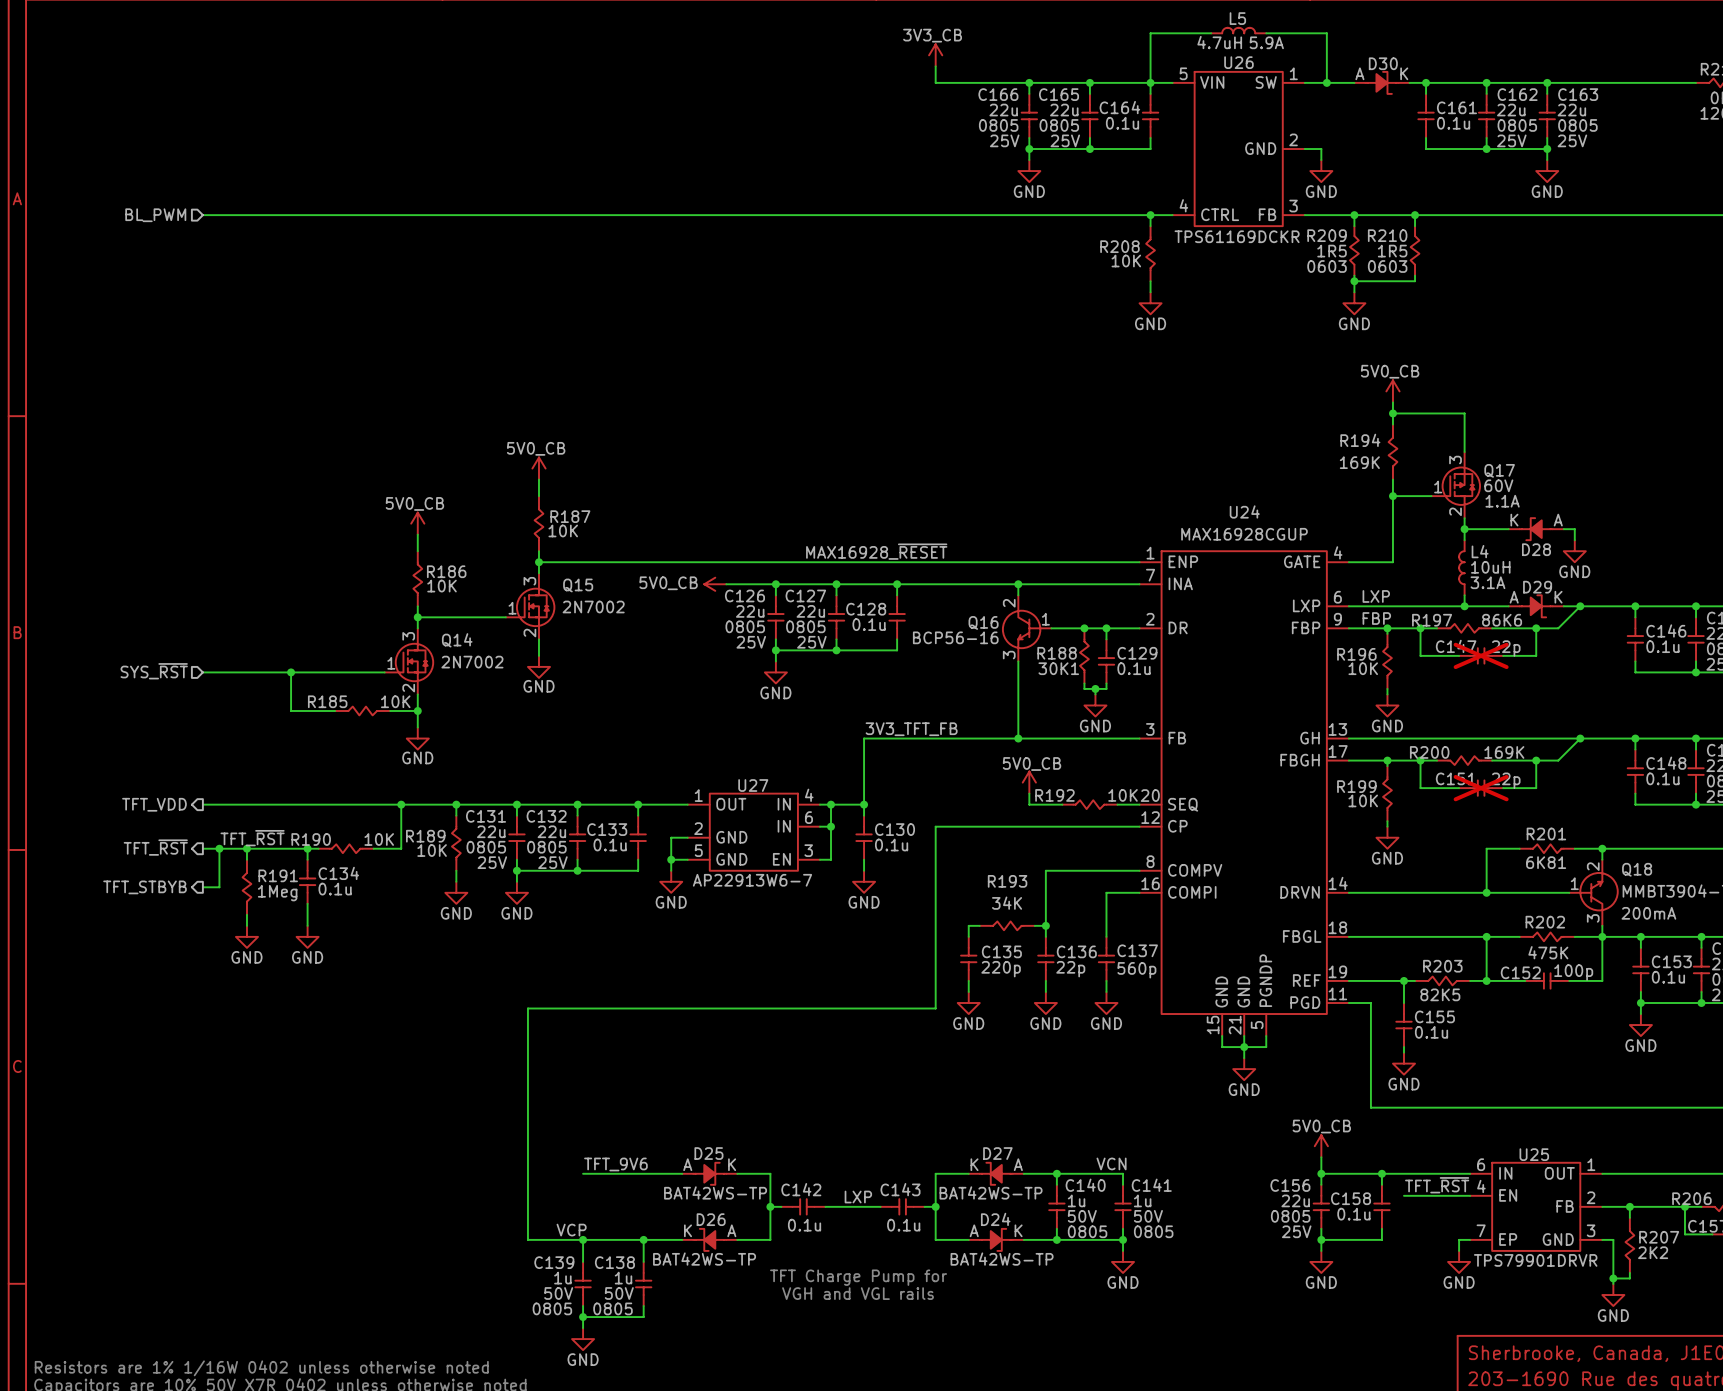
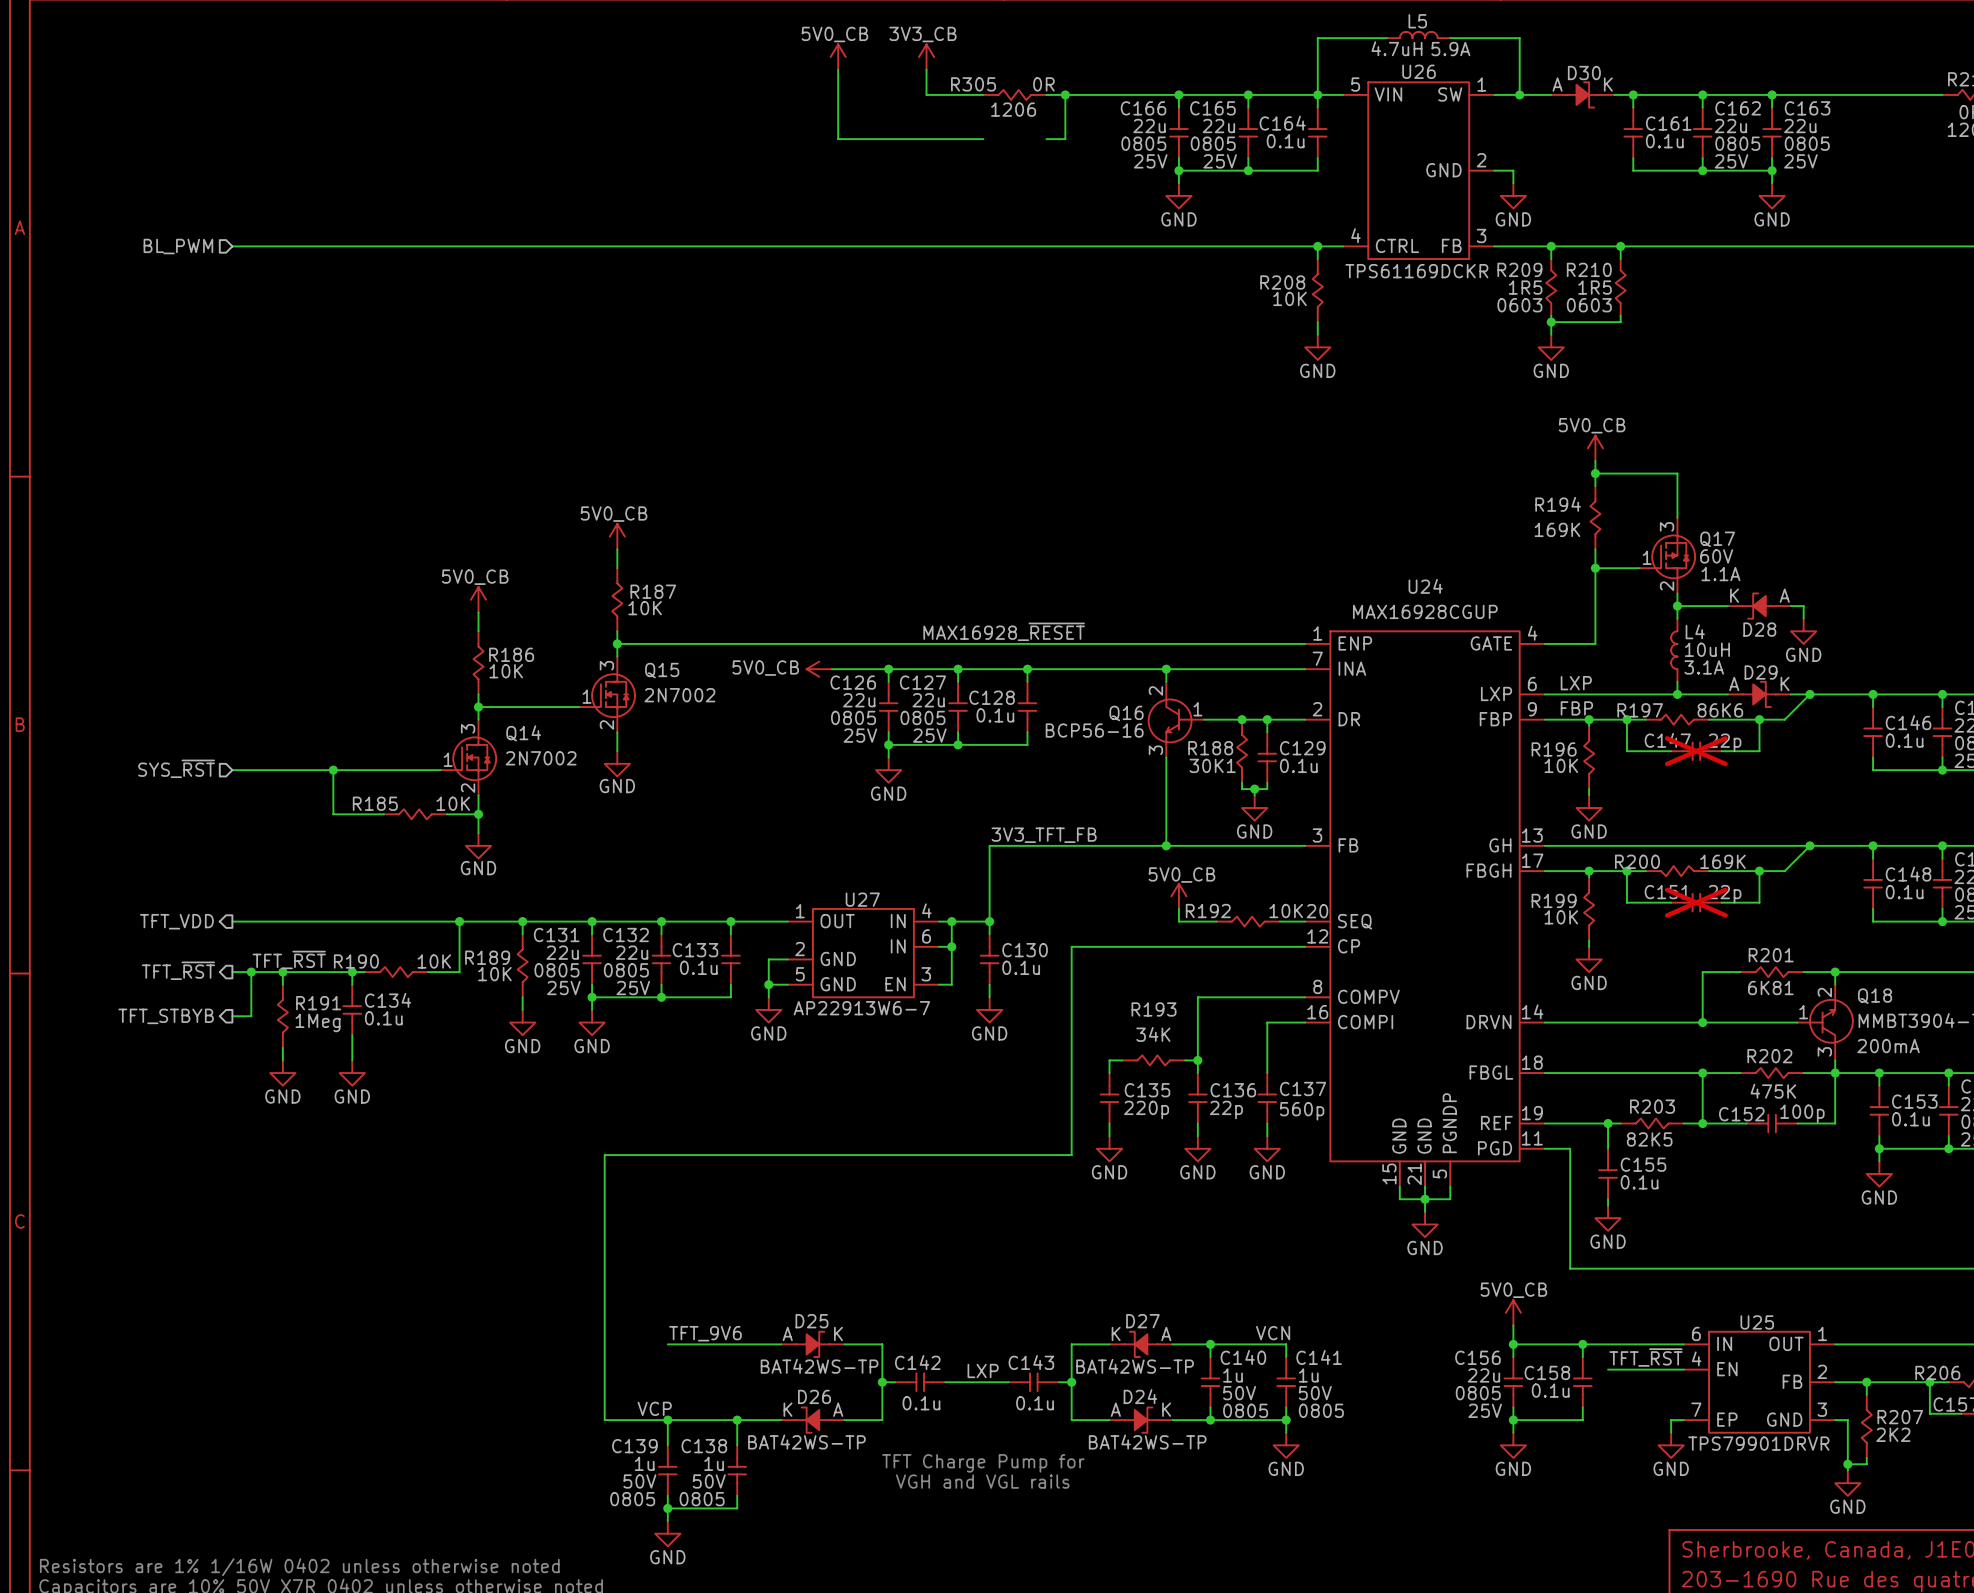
power symbol: none -> 5V0_CB (838, 57)
power symbol position: 3V3_CB (935, 55) -> 3V3_CB (926, 57)
wire: none -> (838, 69) (838, 139) (983, 139)
wire: none -> (926, 69) (926, 94) (983, 94)
wire: (935, 66) (935, 82) -> (1046, 94) (1071, 94)
R305: none -> 0R (1014, 94)
wire: none -> (1065, 94) (1065, 139) (1046, 139)
junction: none -> (1065, 94)

